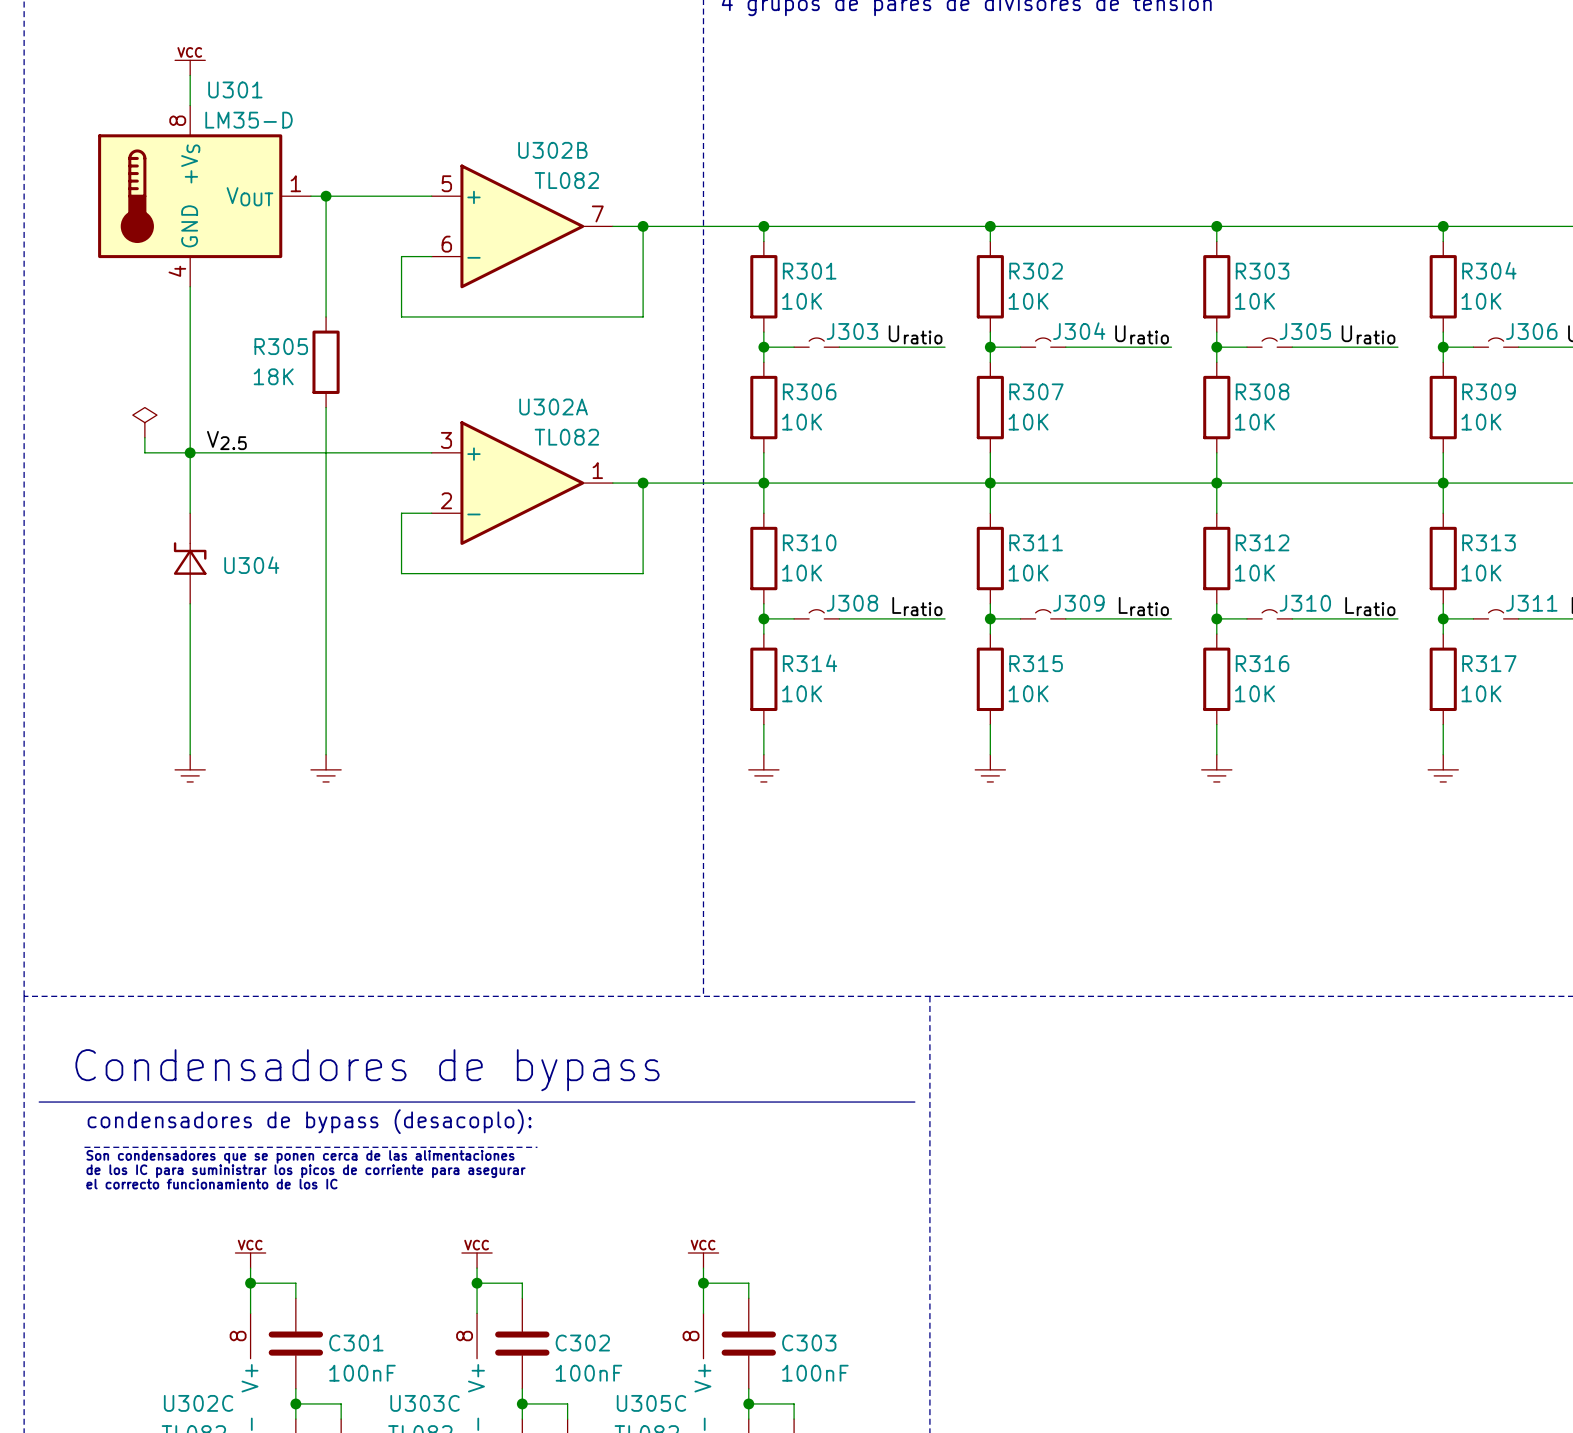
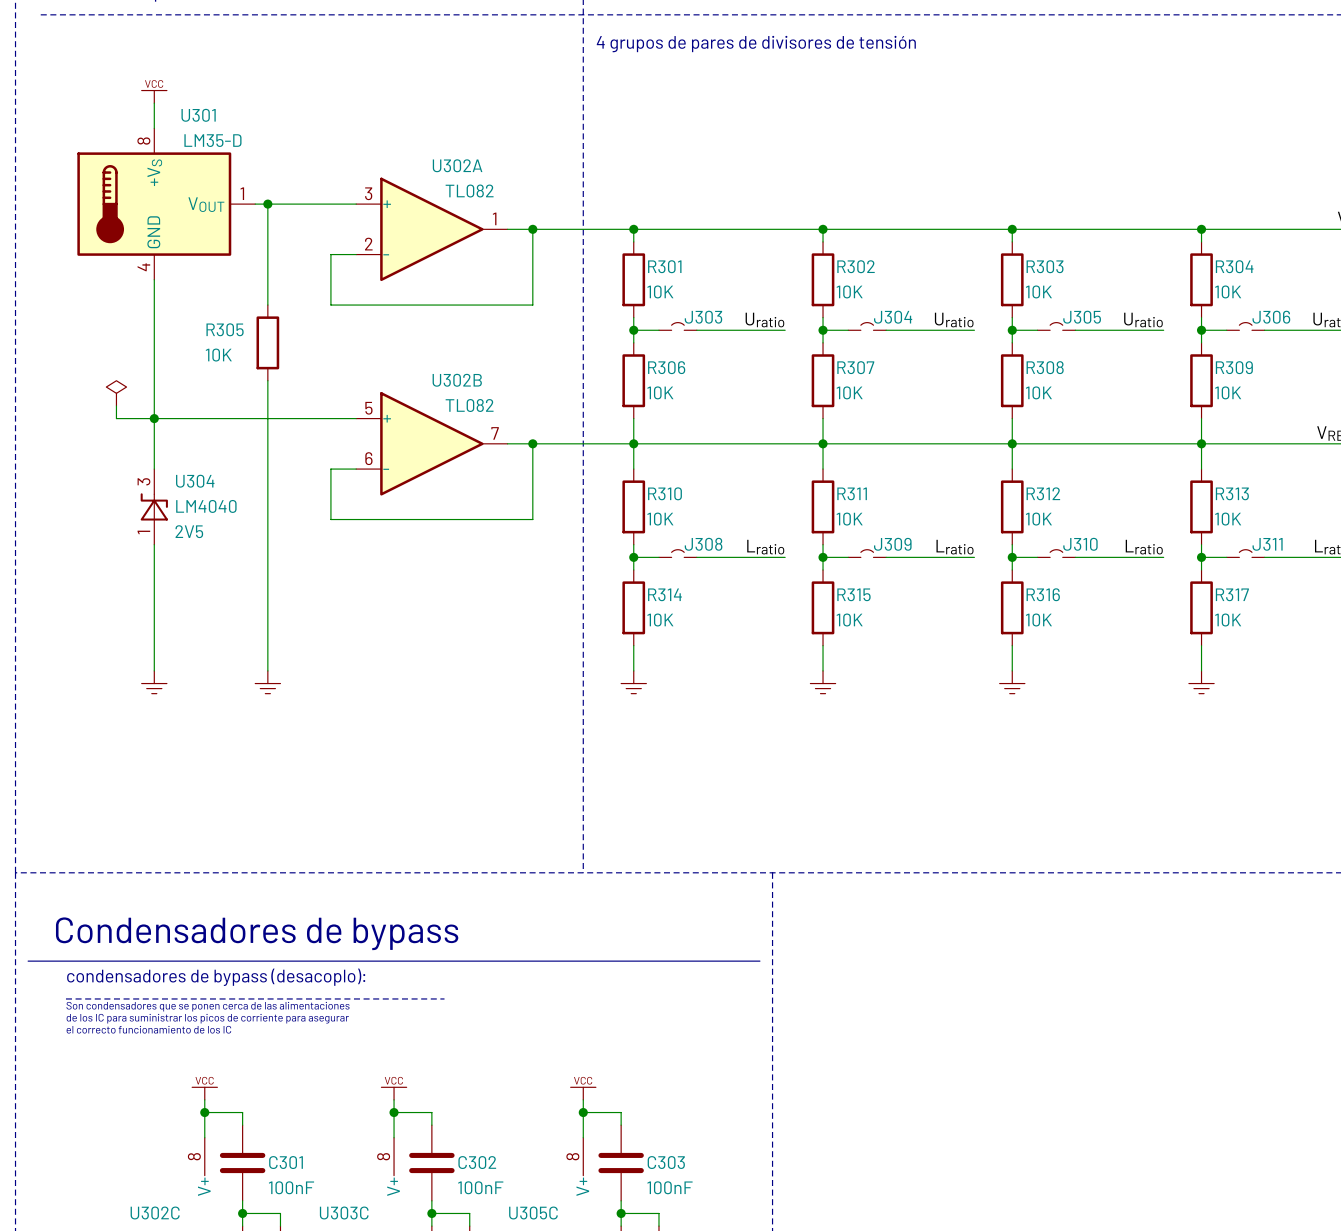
U302B position: (522, 226) -> (431, 443)
R305 value: 18K (273, 376) -> 10K (218, 355)
label: V2.5 (226, 440) -> none
U302A position: (522, 483) -> (431, 229)
U304 pin number: none -> 3 (143, 481)
U304 text: none -> LM4040 (206, 506)
U304 name position: U304 (251, 565) -> U304 (195, 481)
U304 pin number: none -> 1 (143, 532)
U304 text: none -> 2V5 (189, 531)

